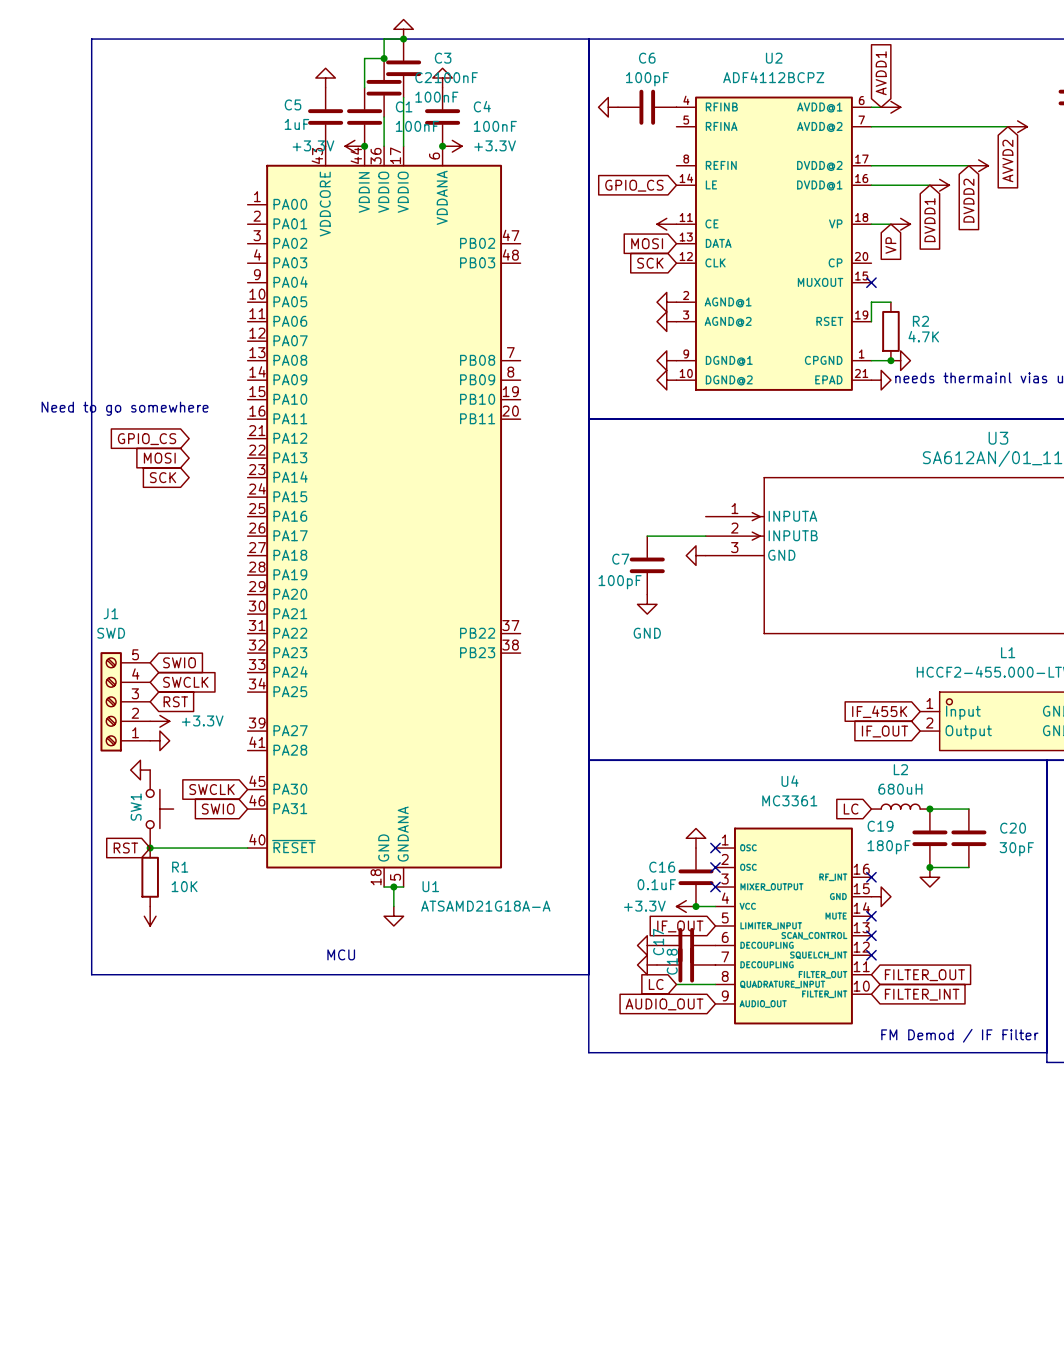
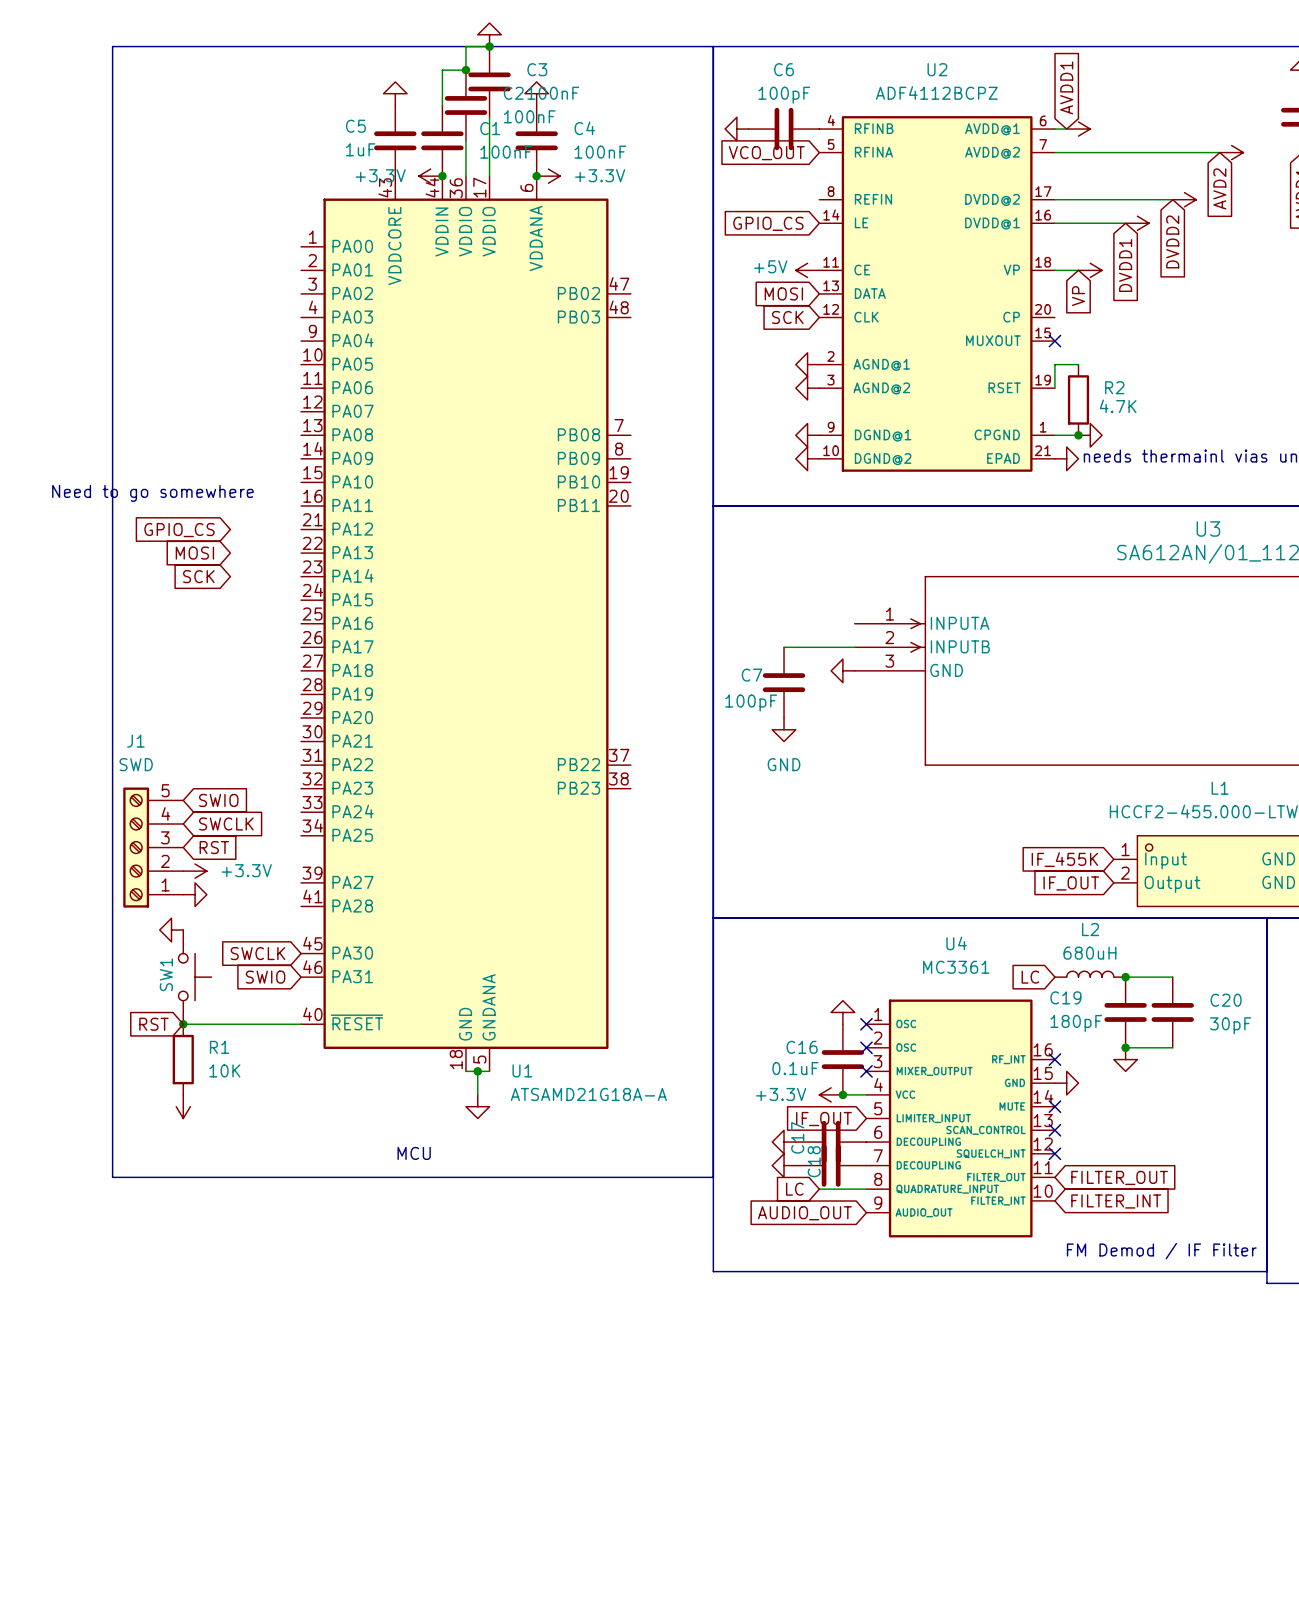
global label: none -> VCO_OUT (766, 153)
global label: AVVD2 (1007, 160) -> AVD2 (1219, 188)
power symbol text: none -> +5V (770, 266)

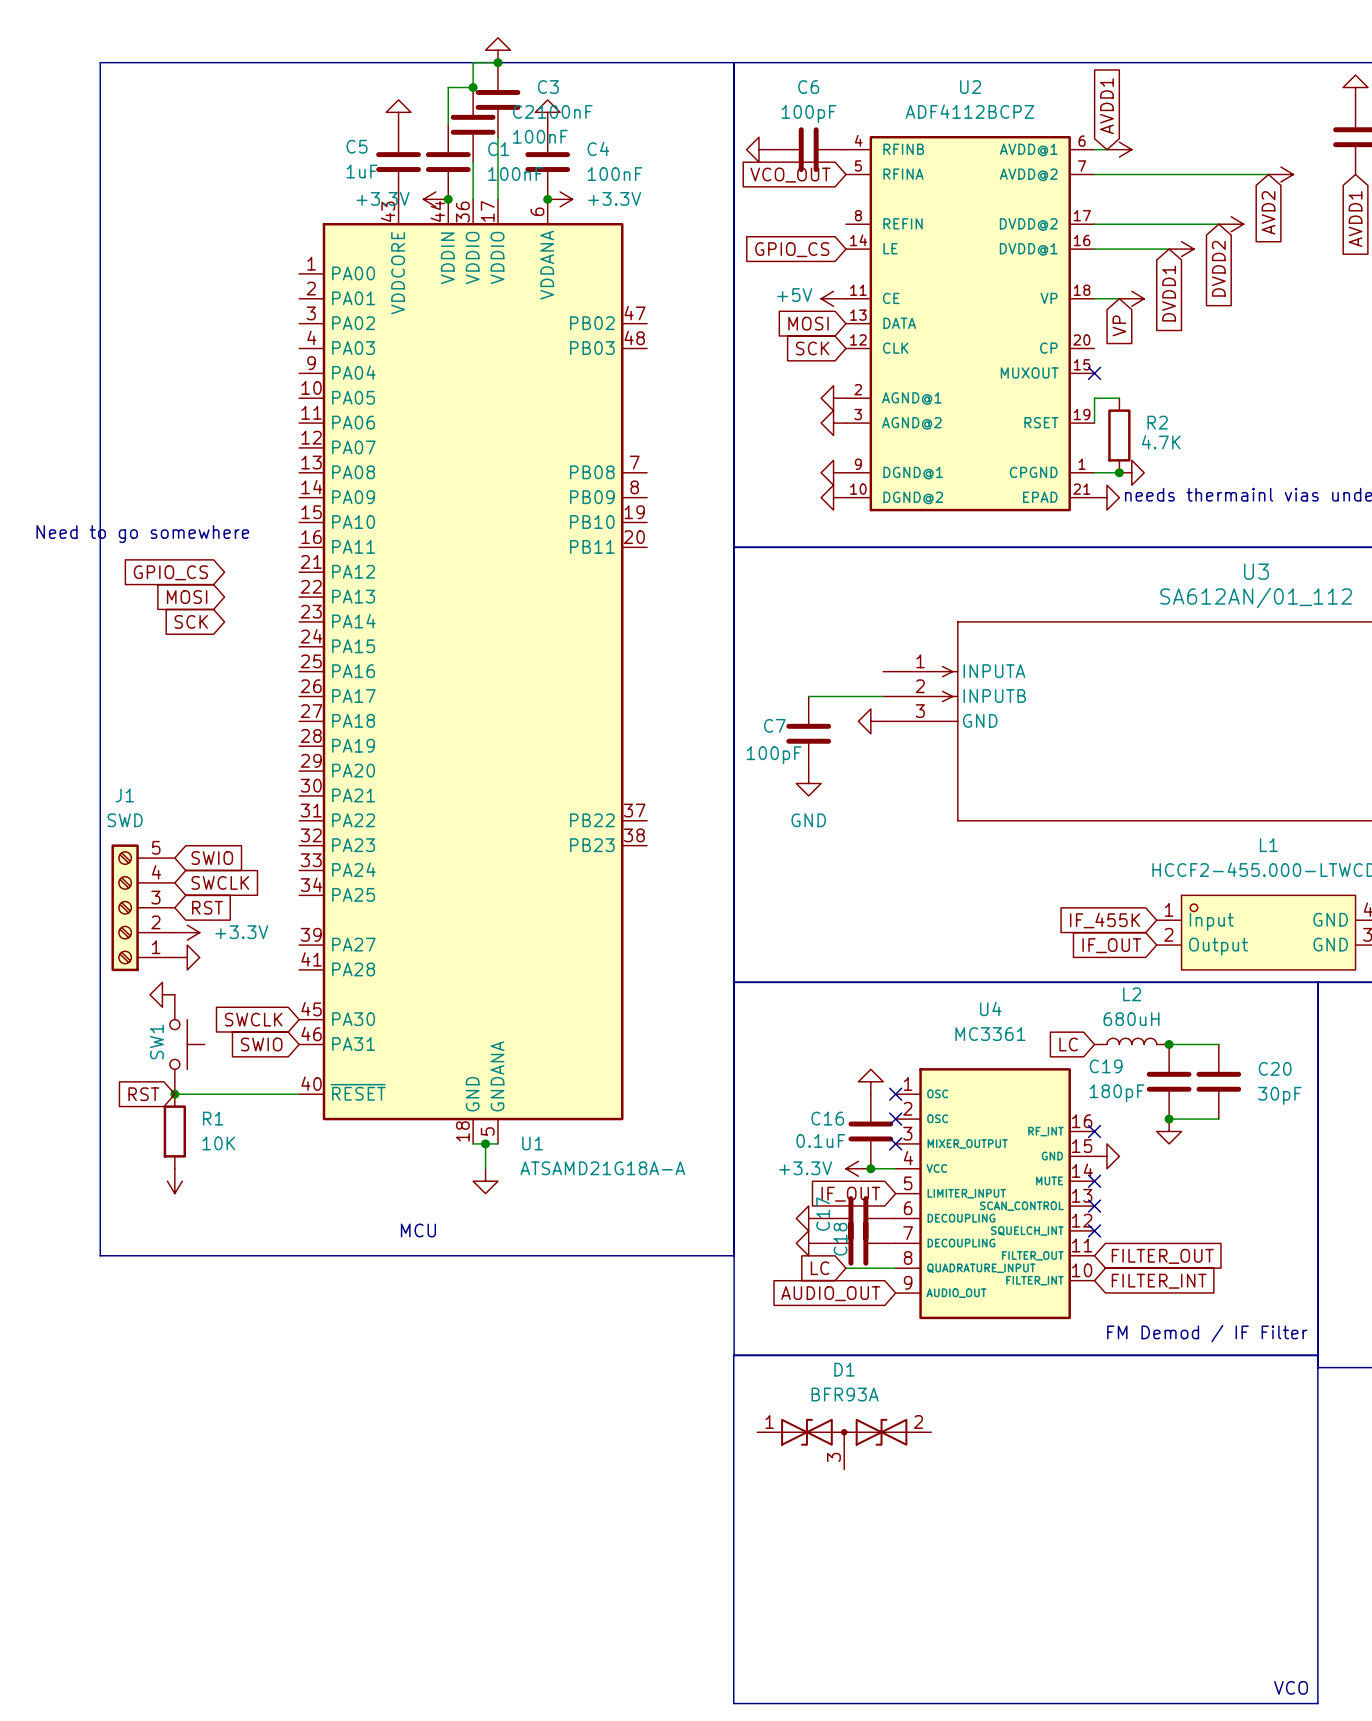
line: none -> (733, 1355) (1317, 1355) (1317, 1703) (733, 1703) (733, 1355)
D1: none -> BFR93A (844, 1444)
text: none -> VCO (1291, 1687)

